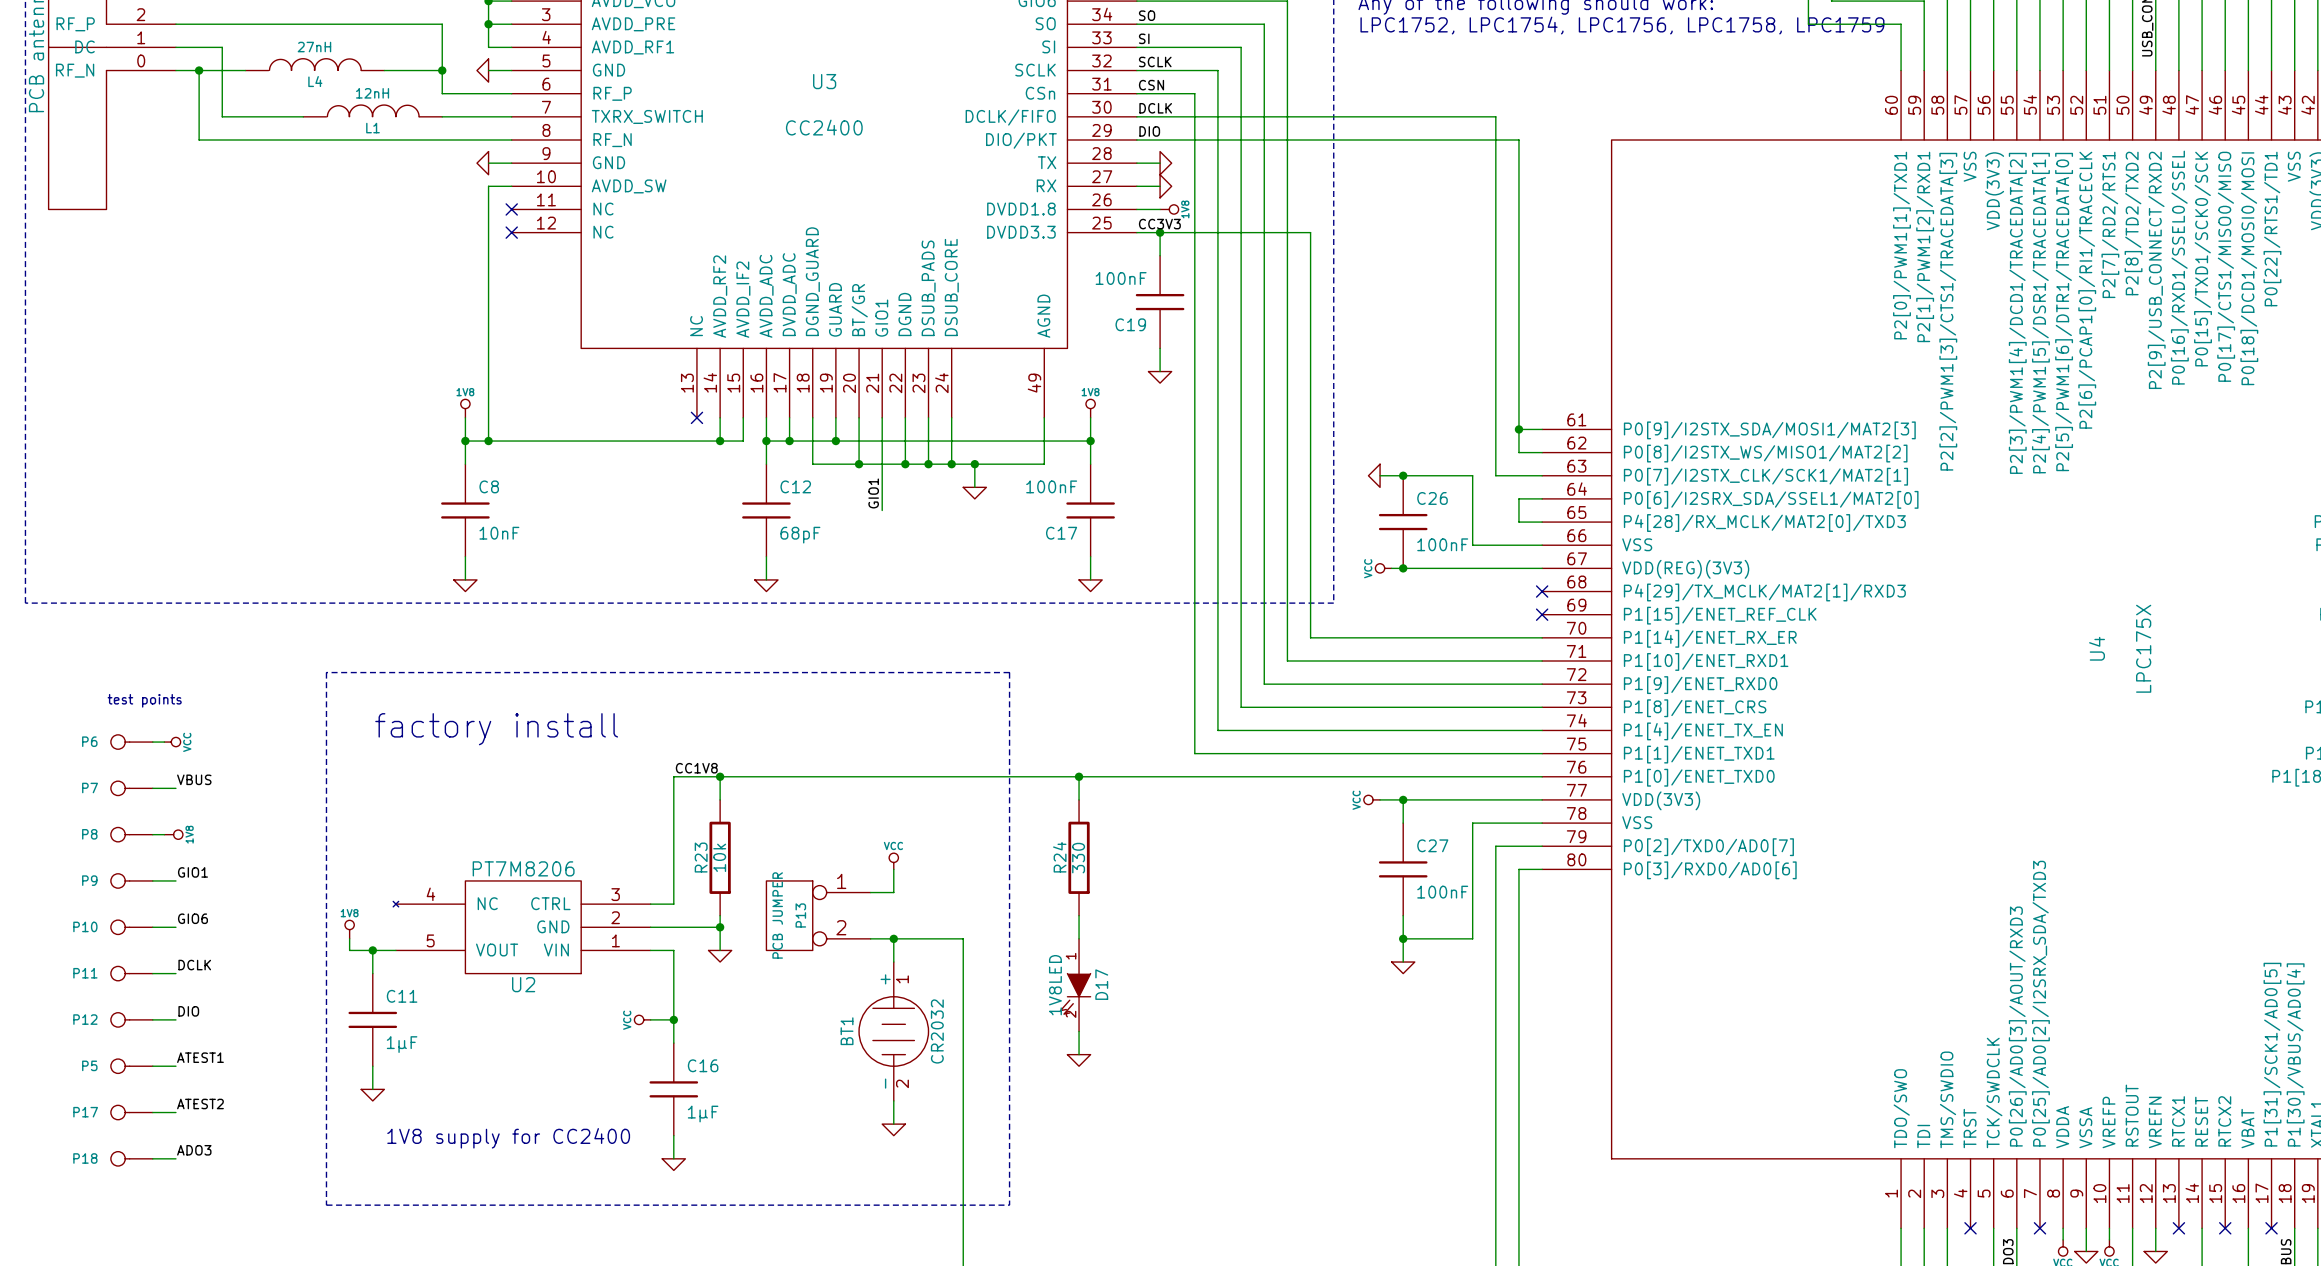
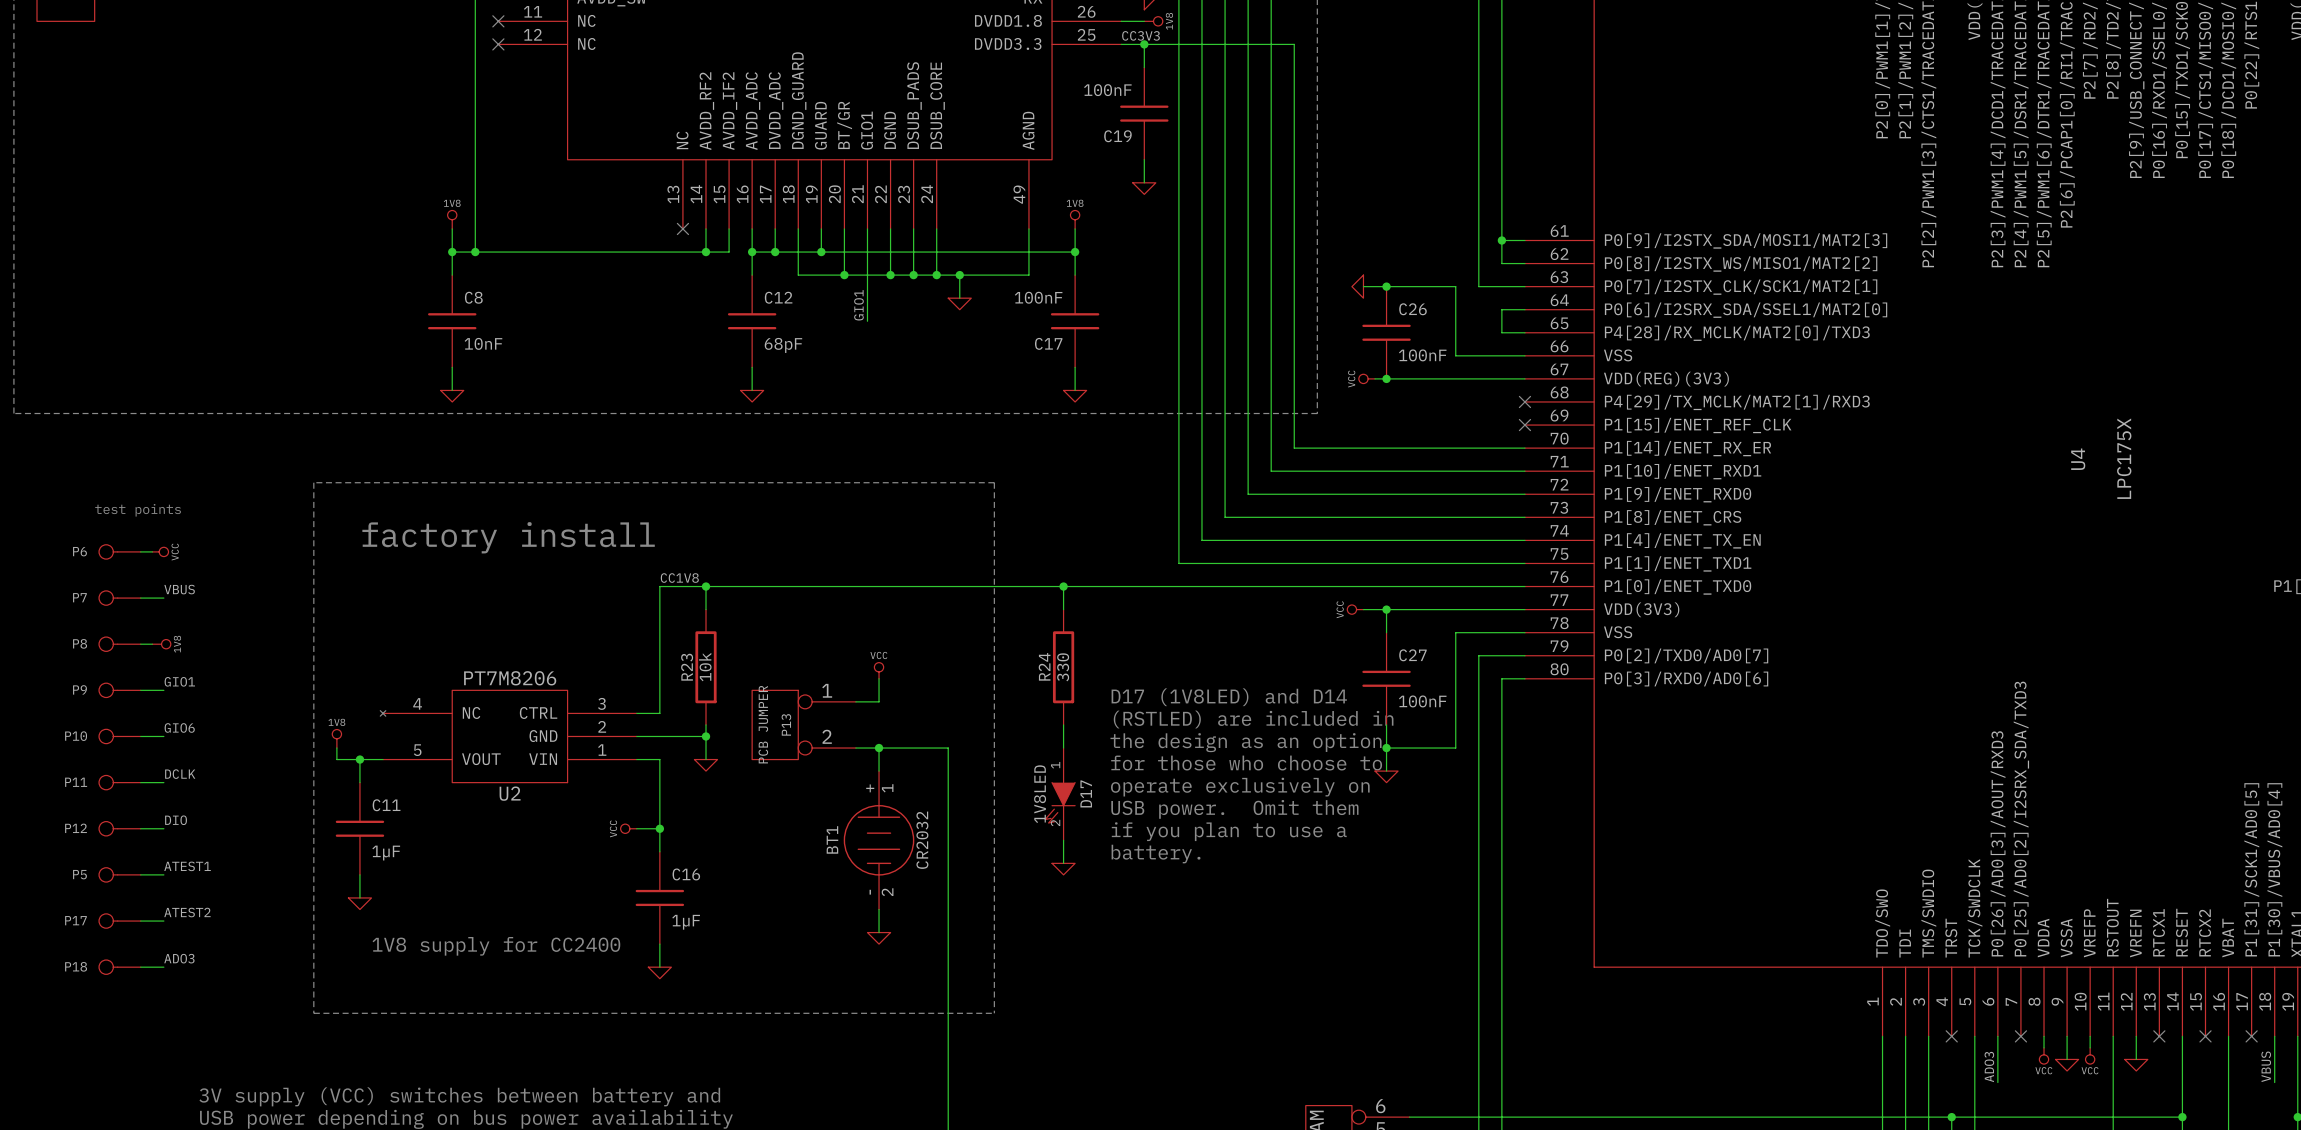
text: none -> D17 (1V8LED) and D14 (1229, 697)
text: none -> (RSTLED) are included in (1253, 719)
text: none -> the design as an option (1246, 742)
text: none -> for those who choose to (1246, 763)
text: none -> operate exclusively on (1240, 787)
text: none -> USB power. Omit them (1234, 809)
text: none -> if you plan to use a (1229, 831)
text: none -> battery. (1156, 854)

